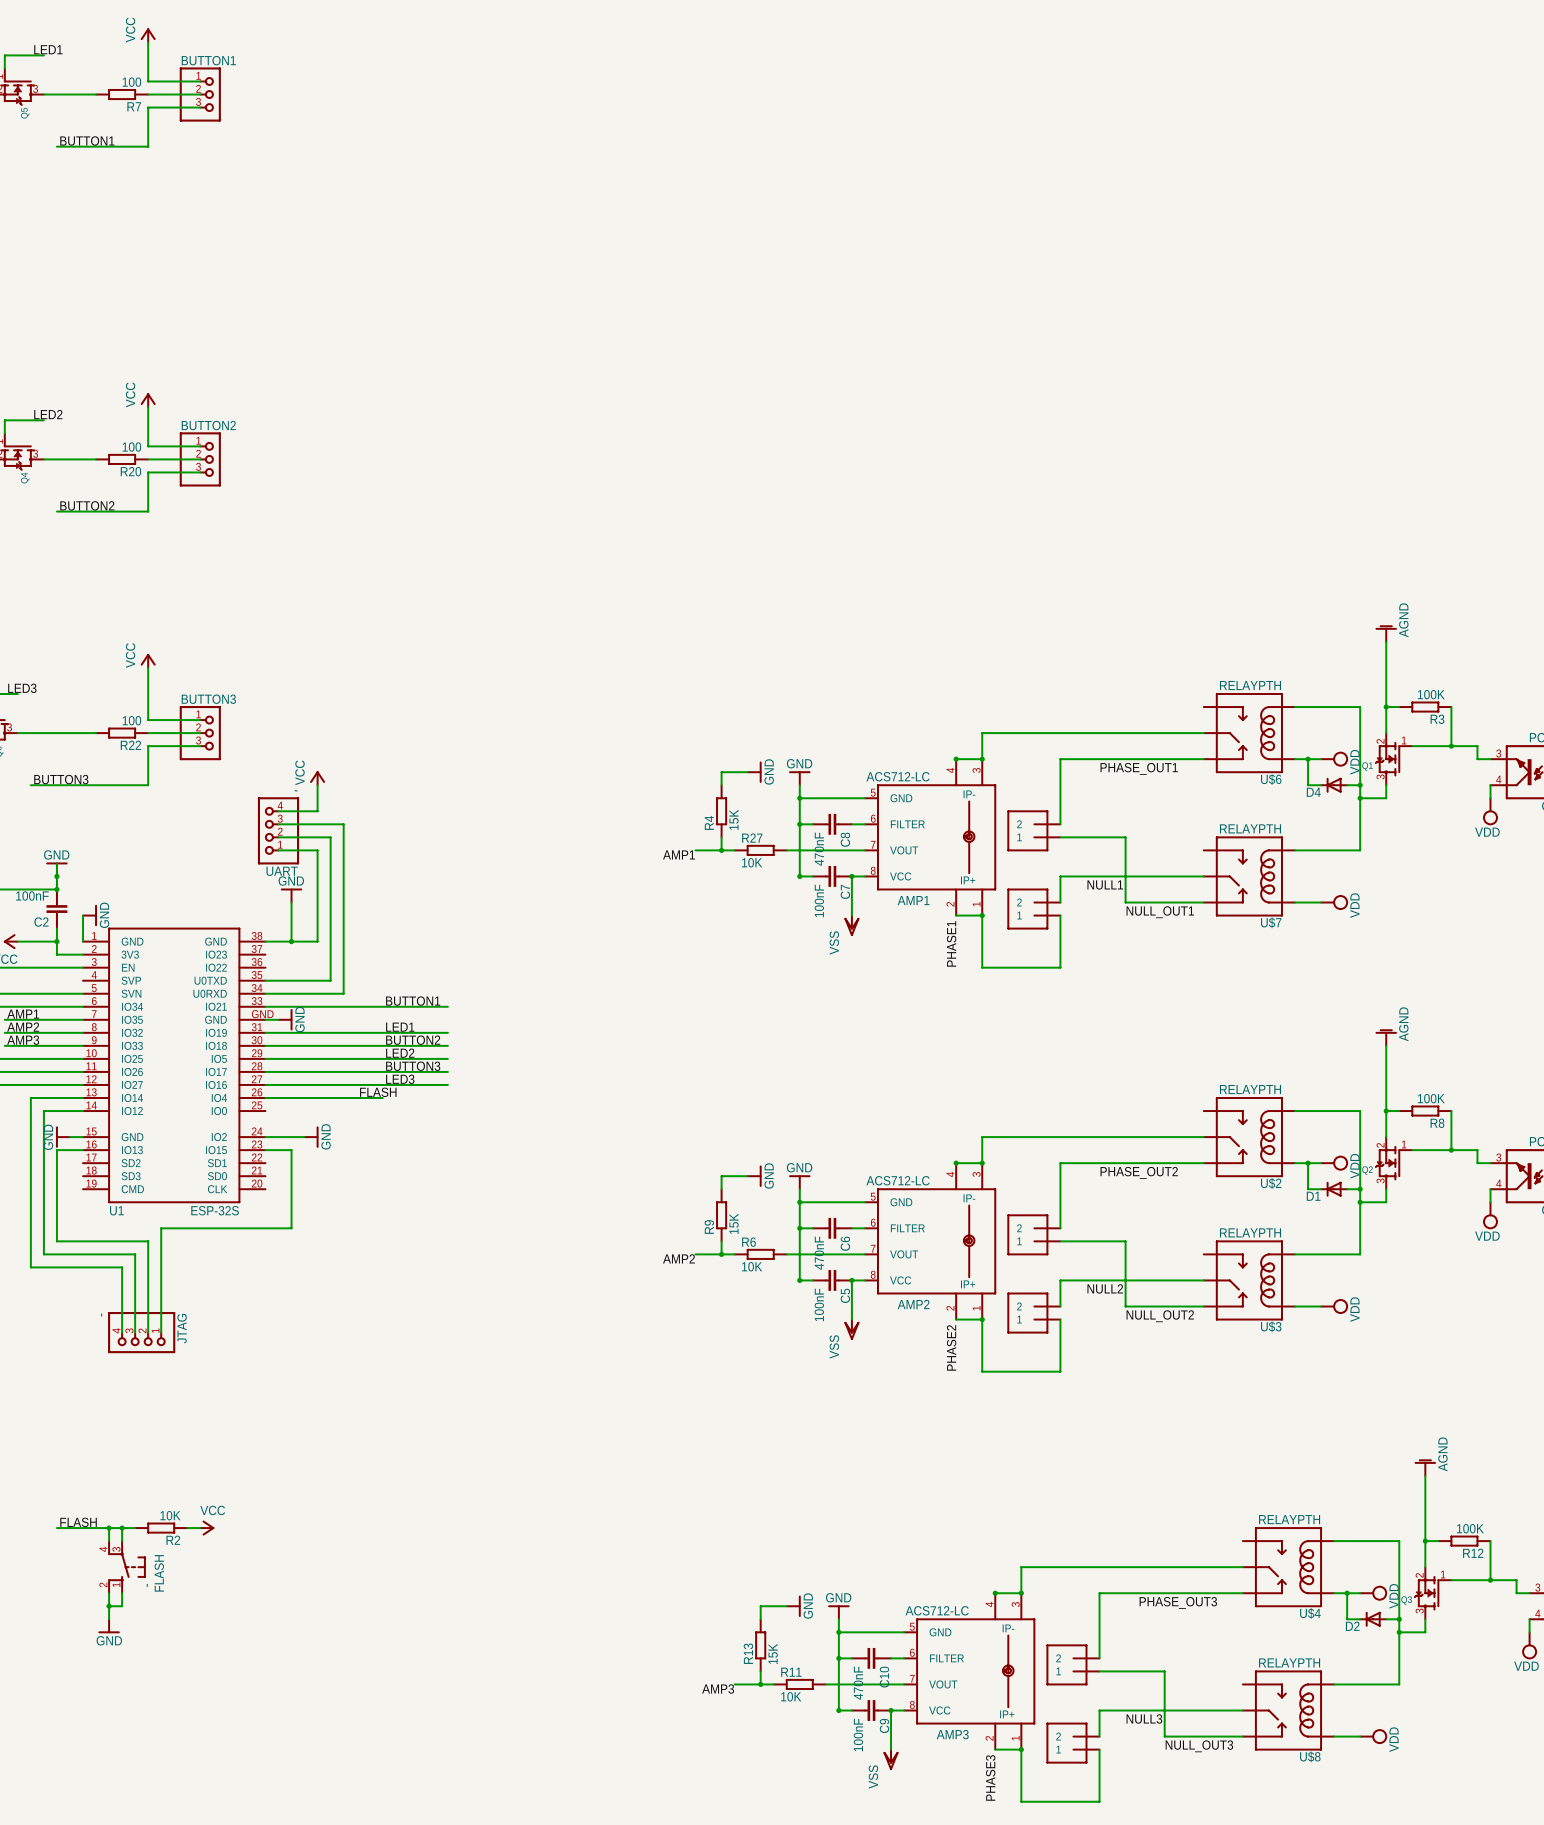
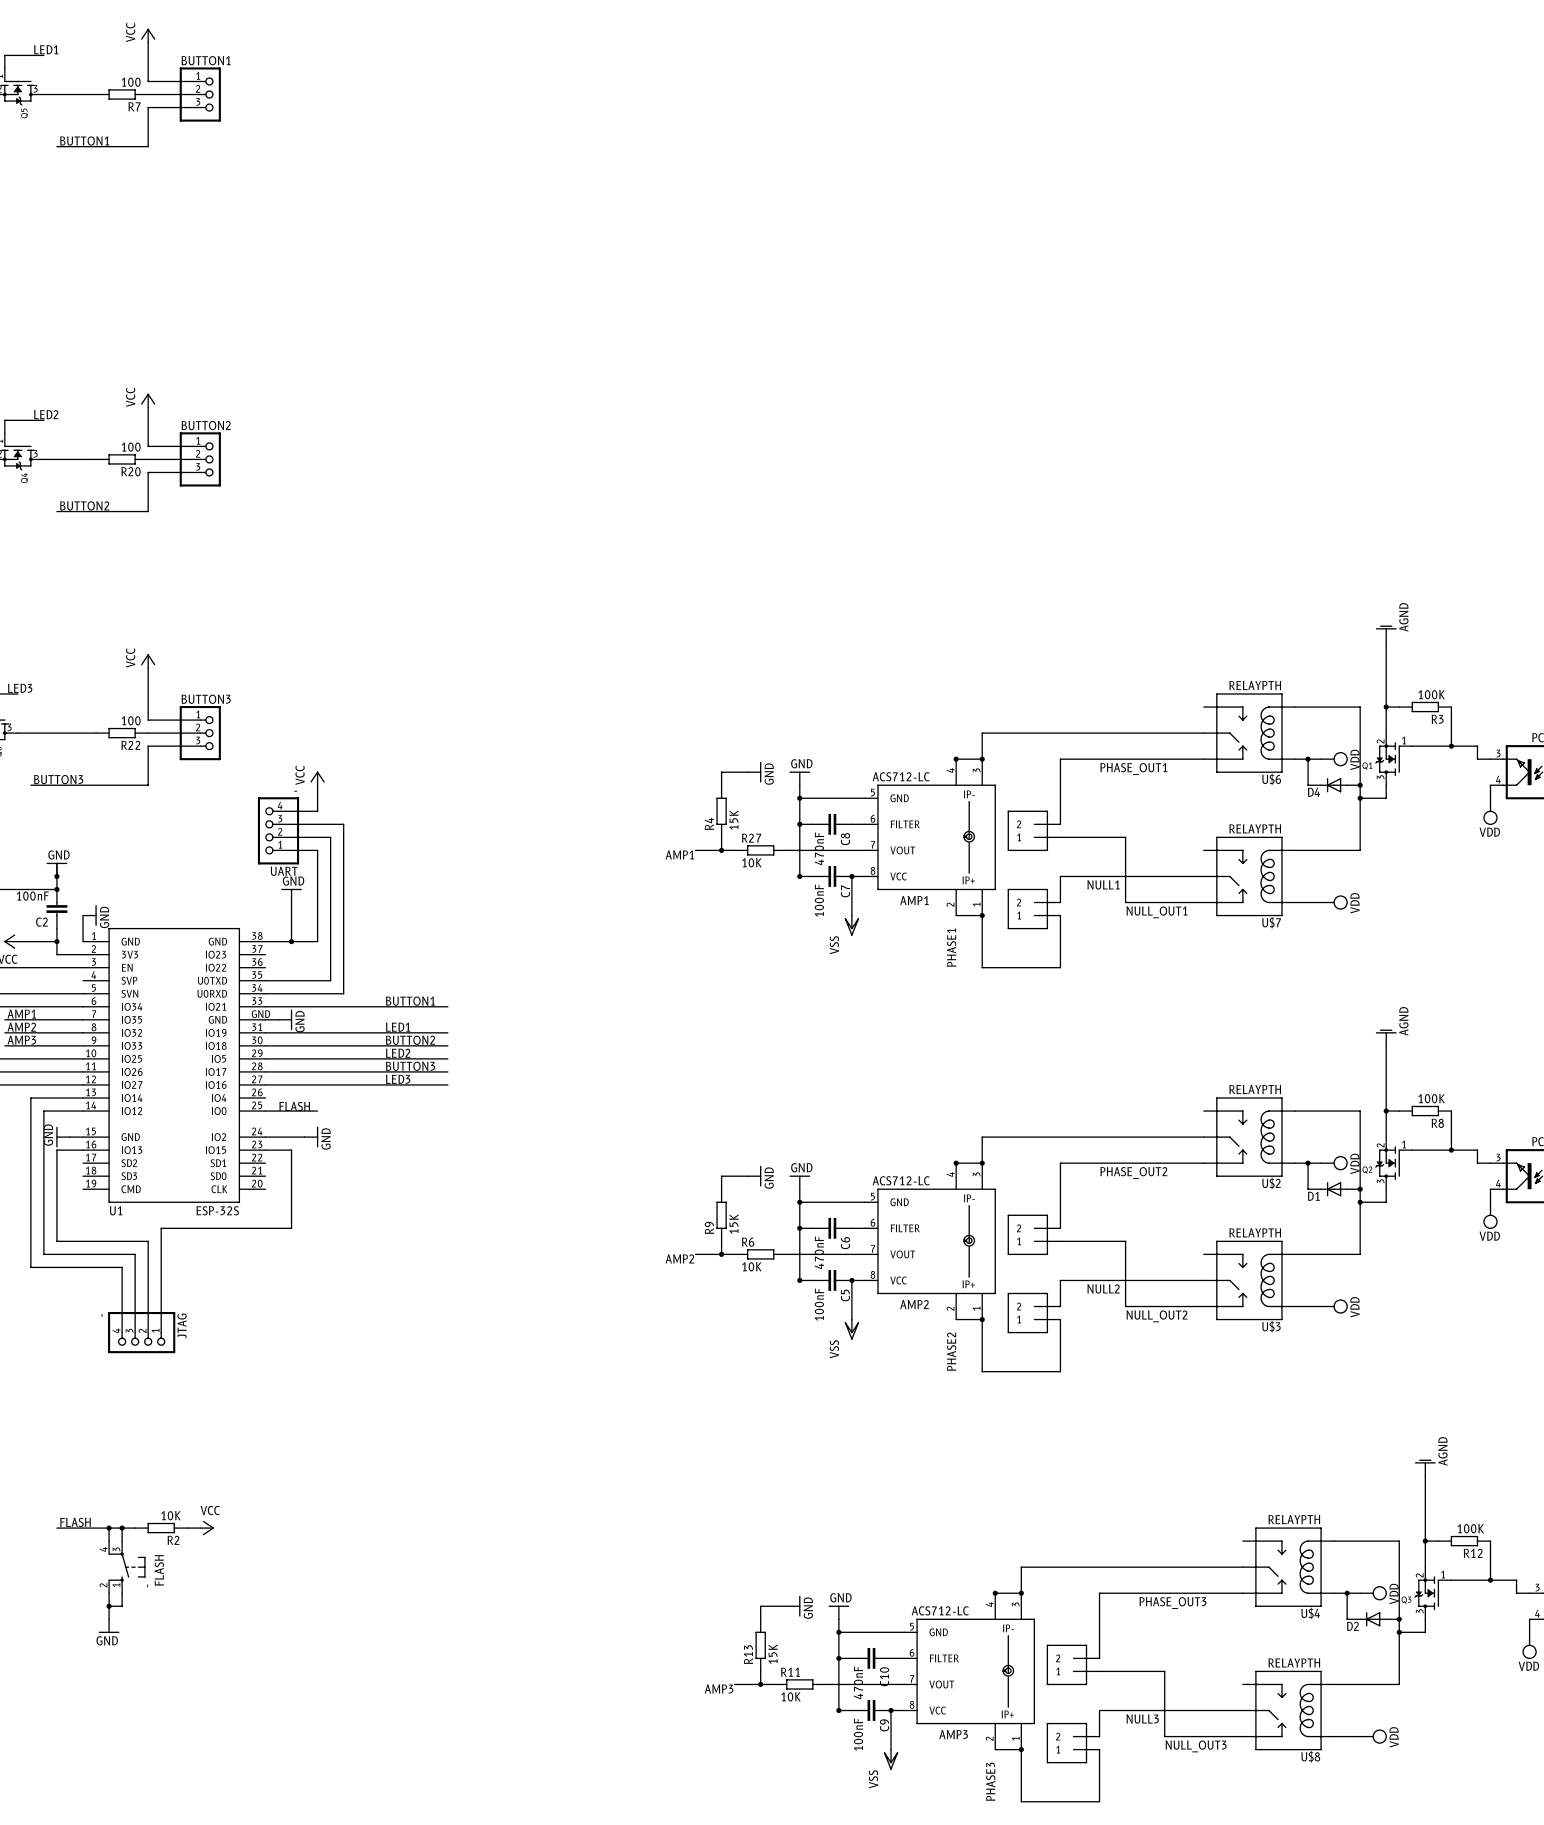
label position: FLASH (378, 1092) -> FLASH (294, 1106)
wire: (265, 1098) (382, 1098) -> none
wire: none -> (265, 1111) (317, 1111)

